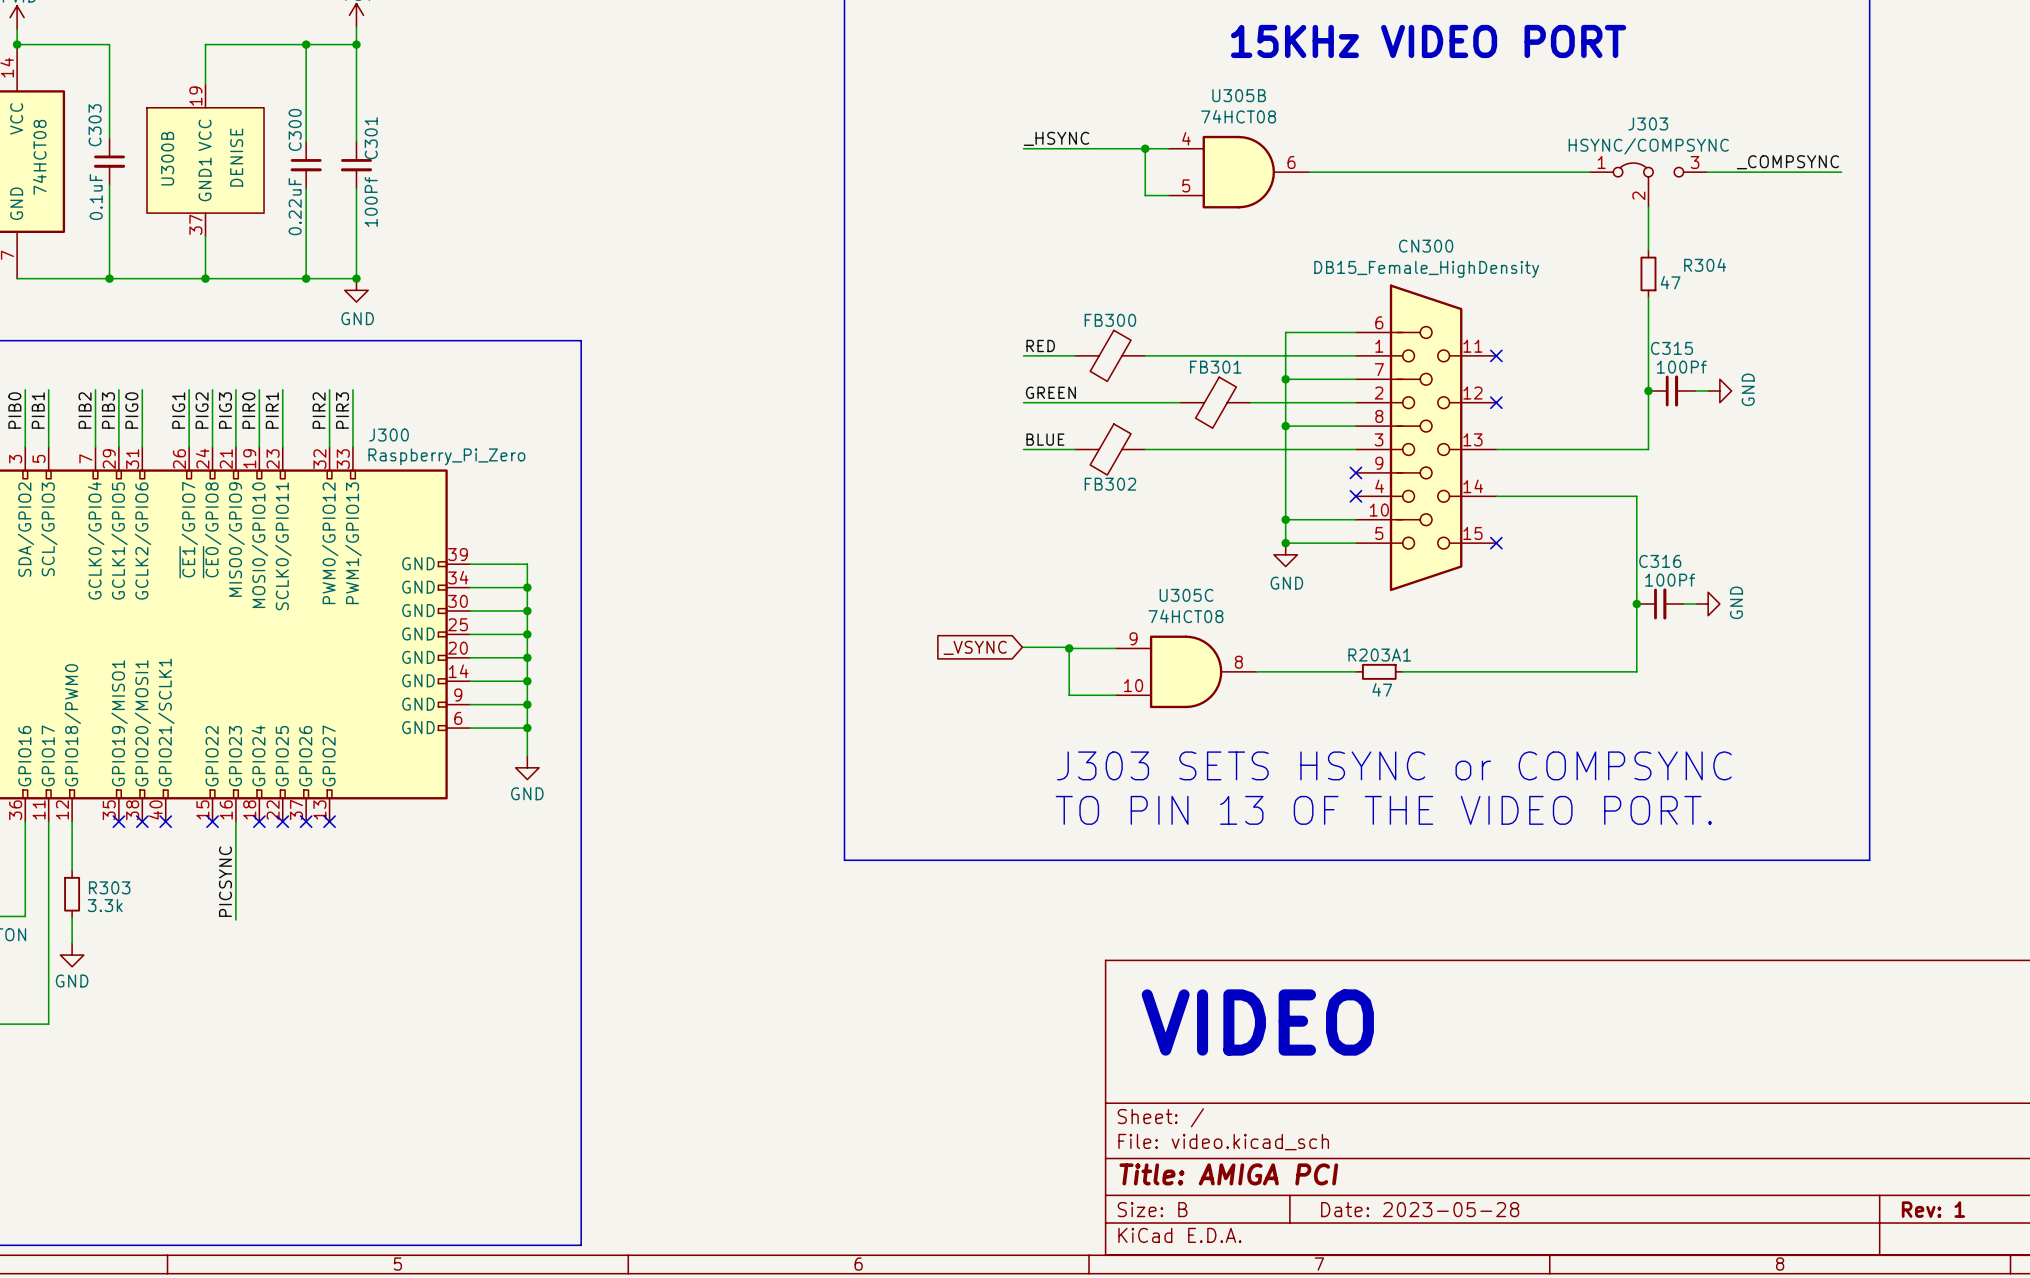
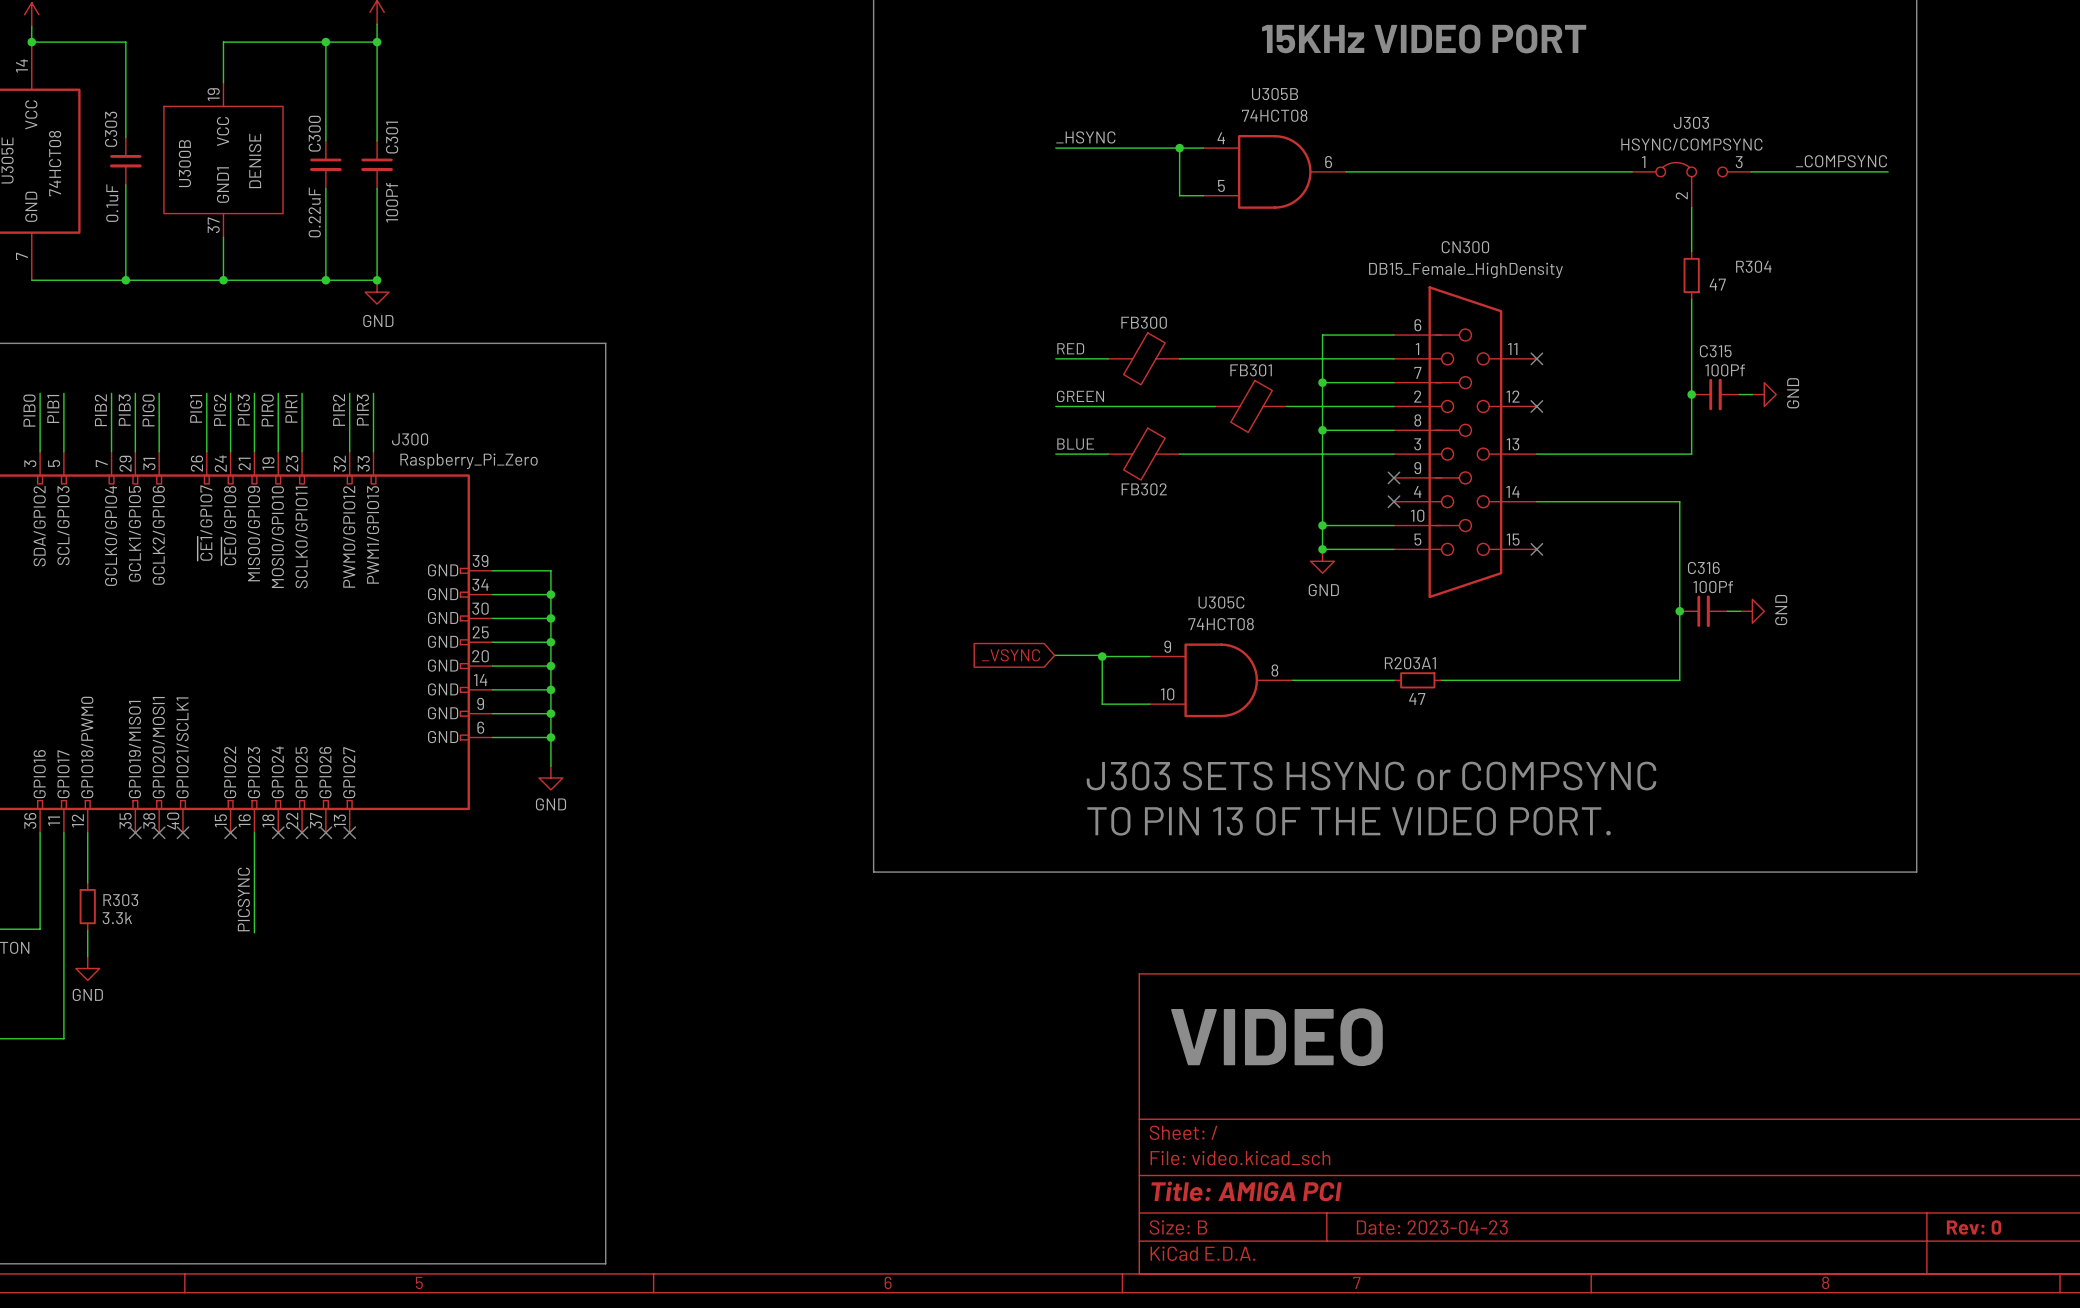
title block: Date: 2023-05-28 (1420, 1209) -> Date: 2023-04-23 (1432, 1227)
title block: Rev: 1 (1933, 1209) -> Rev: 0 (1974, 1227)

